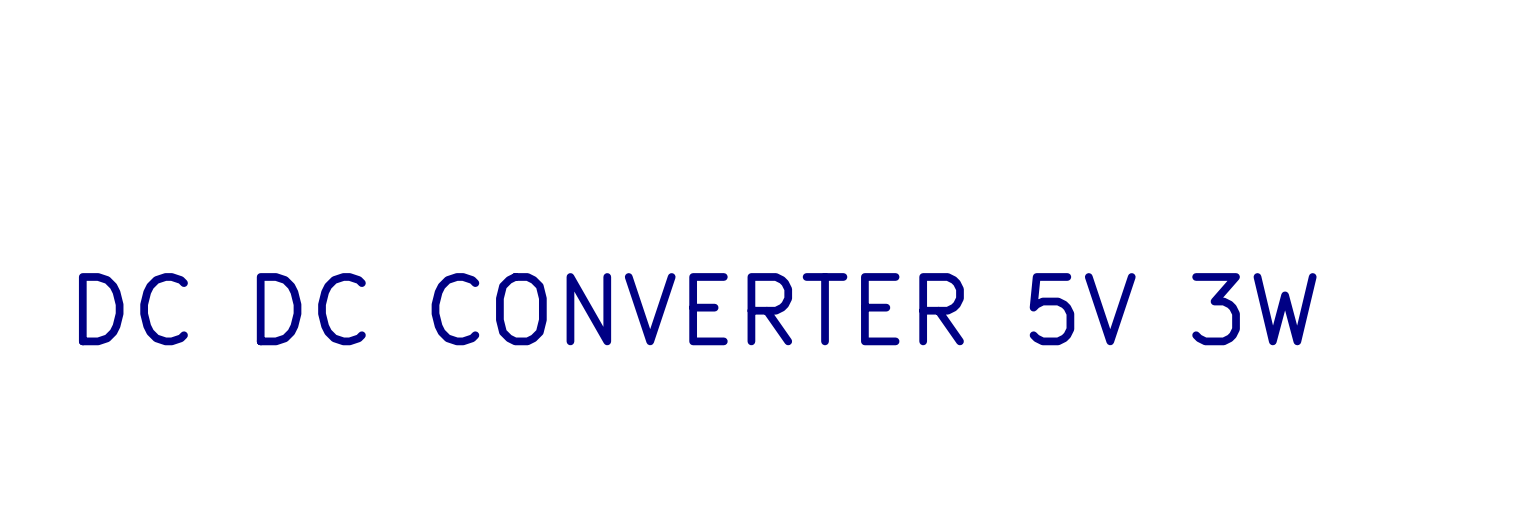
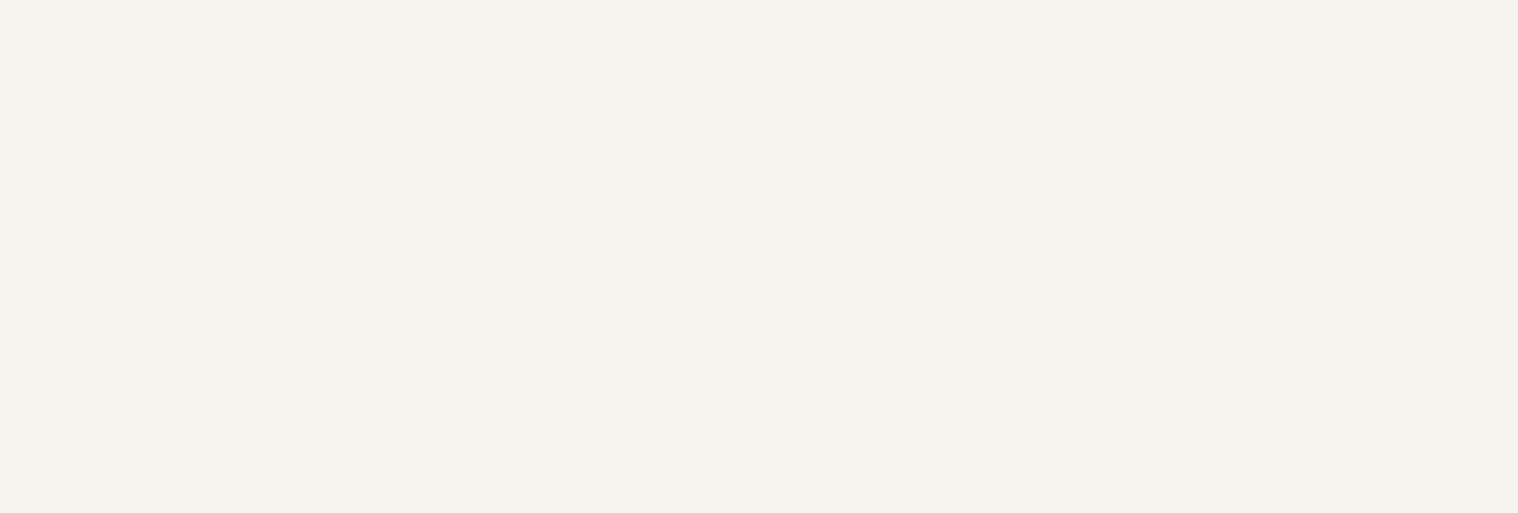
text: DC DC CONVERTER 5V 3W (697, 309) -> none

